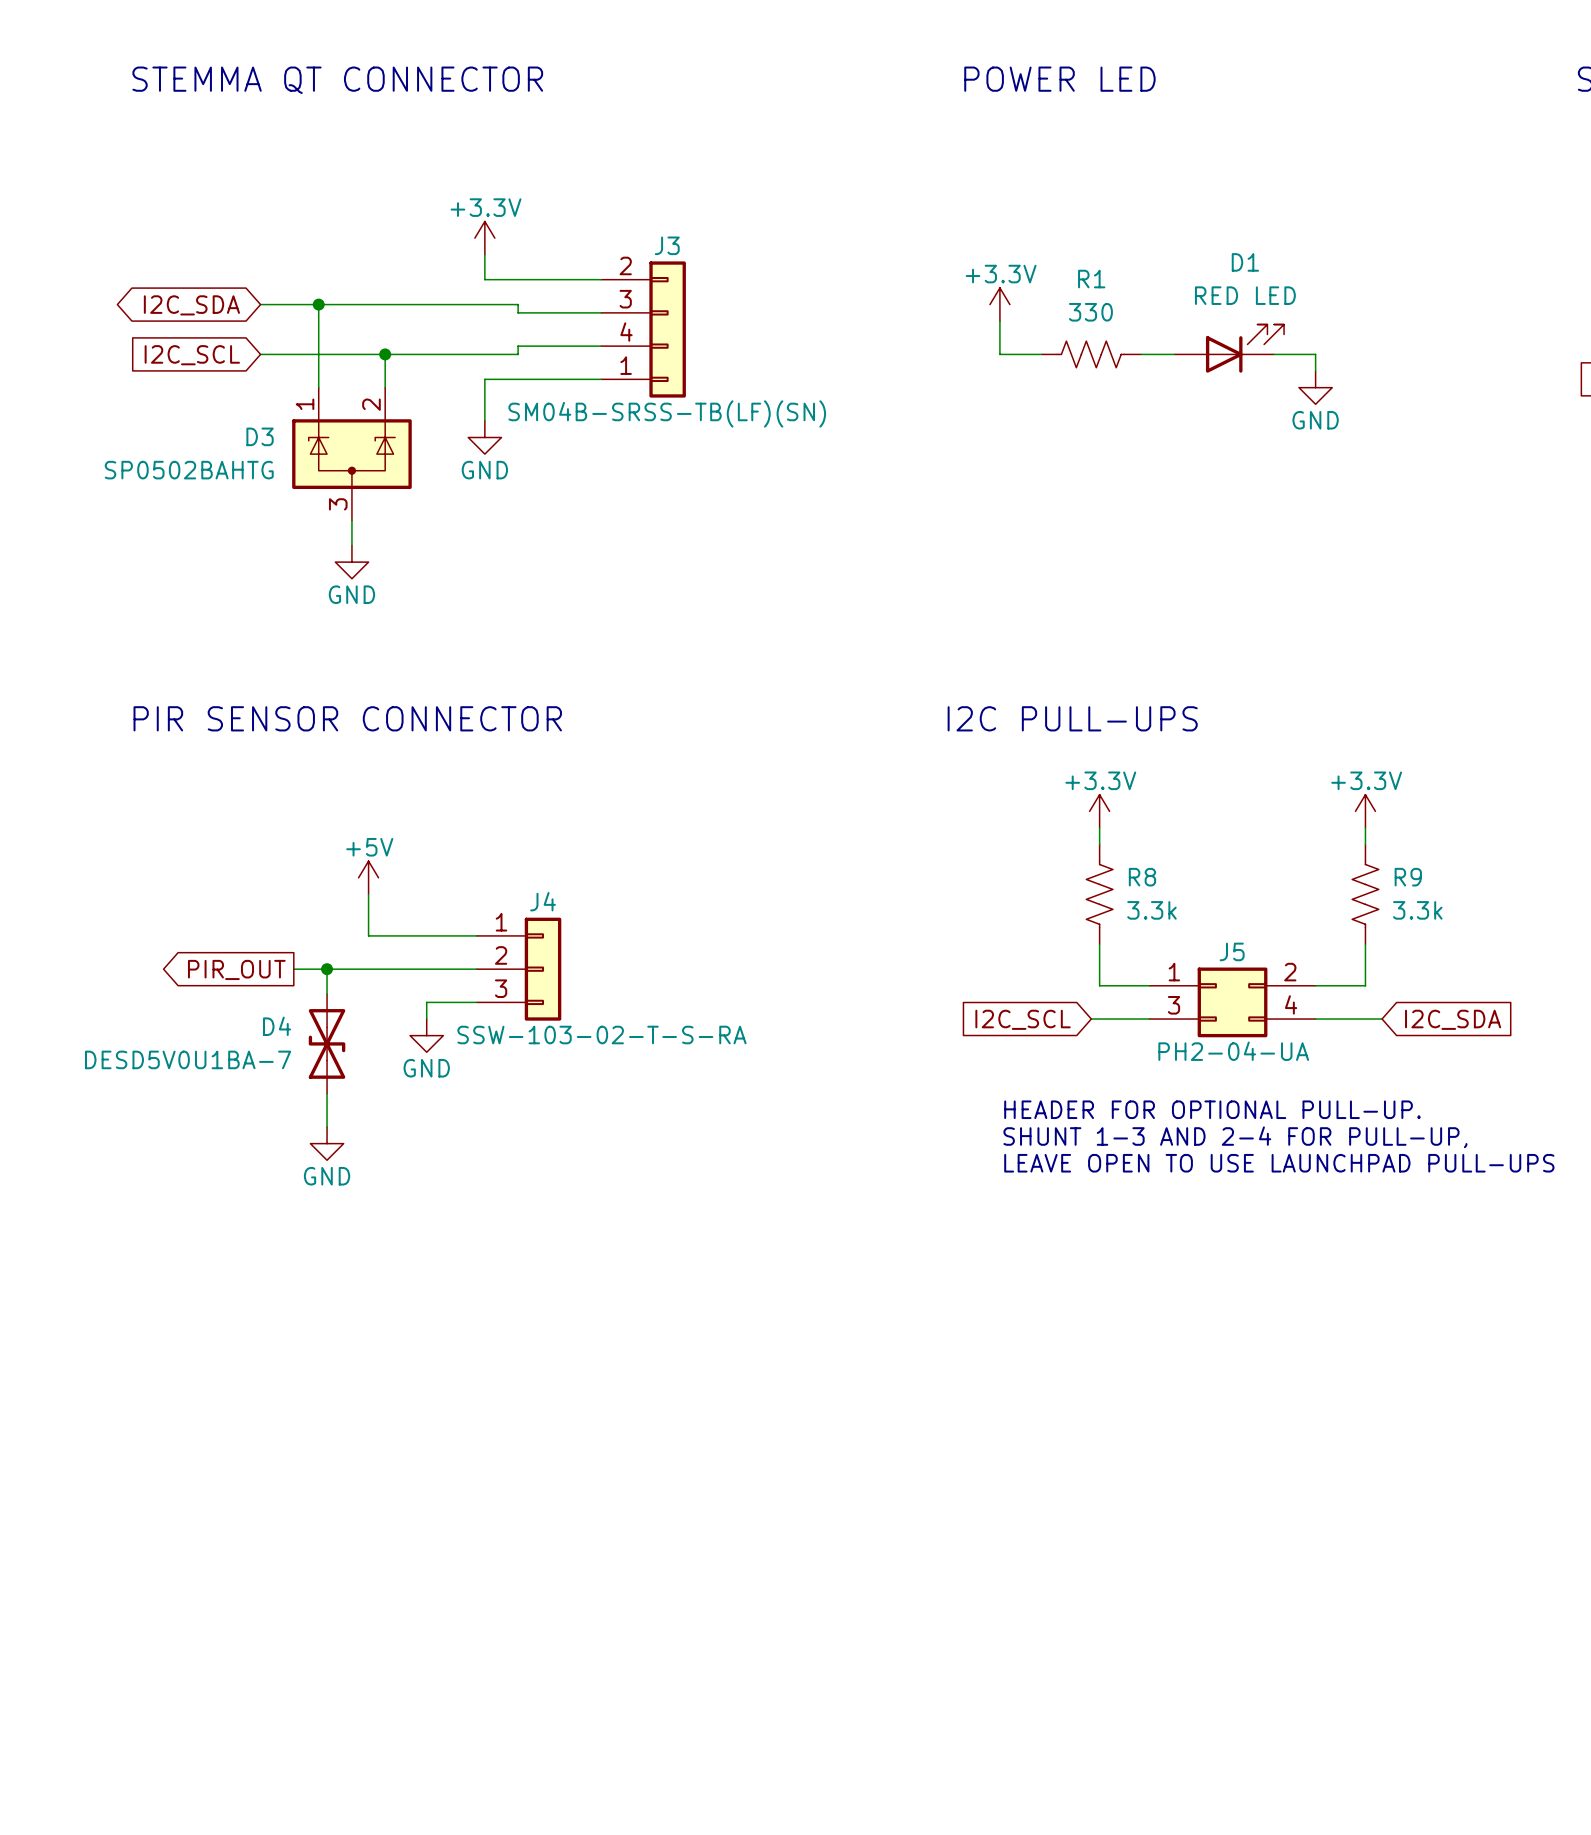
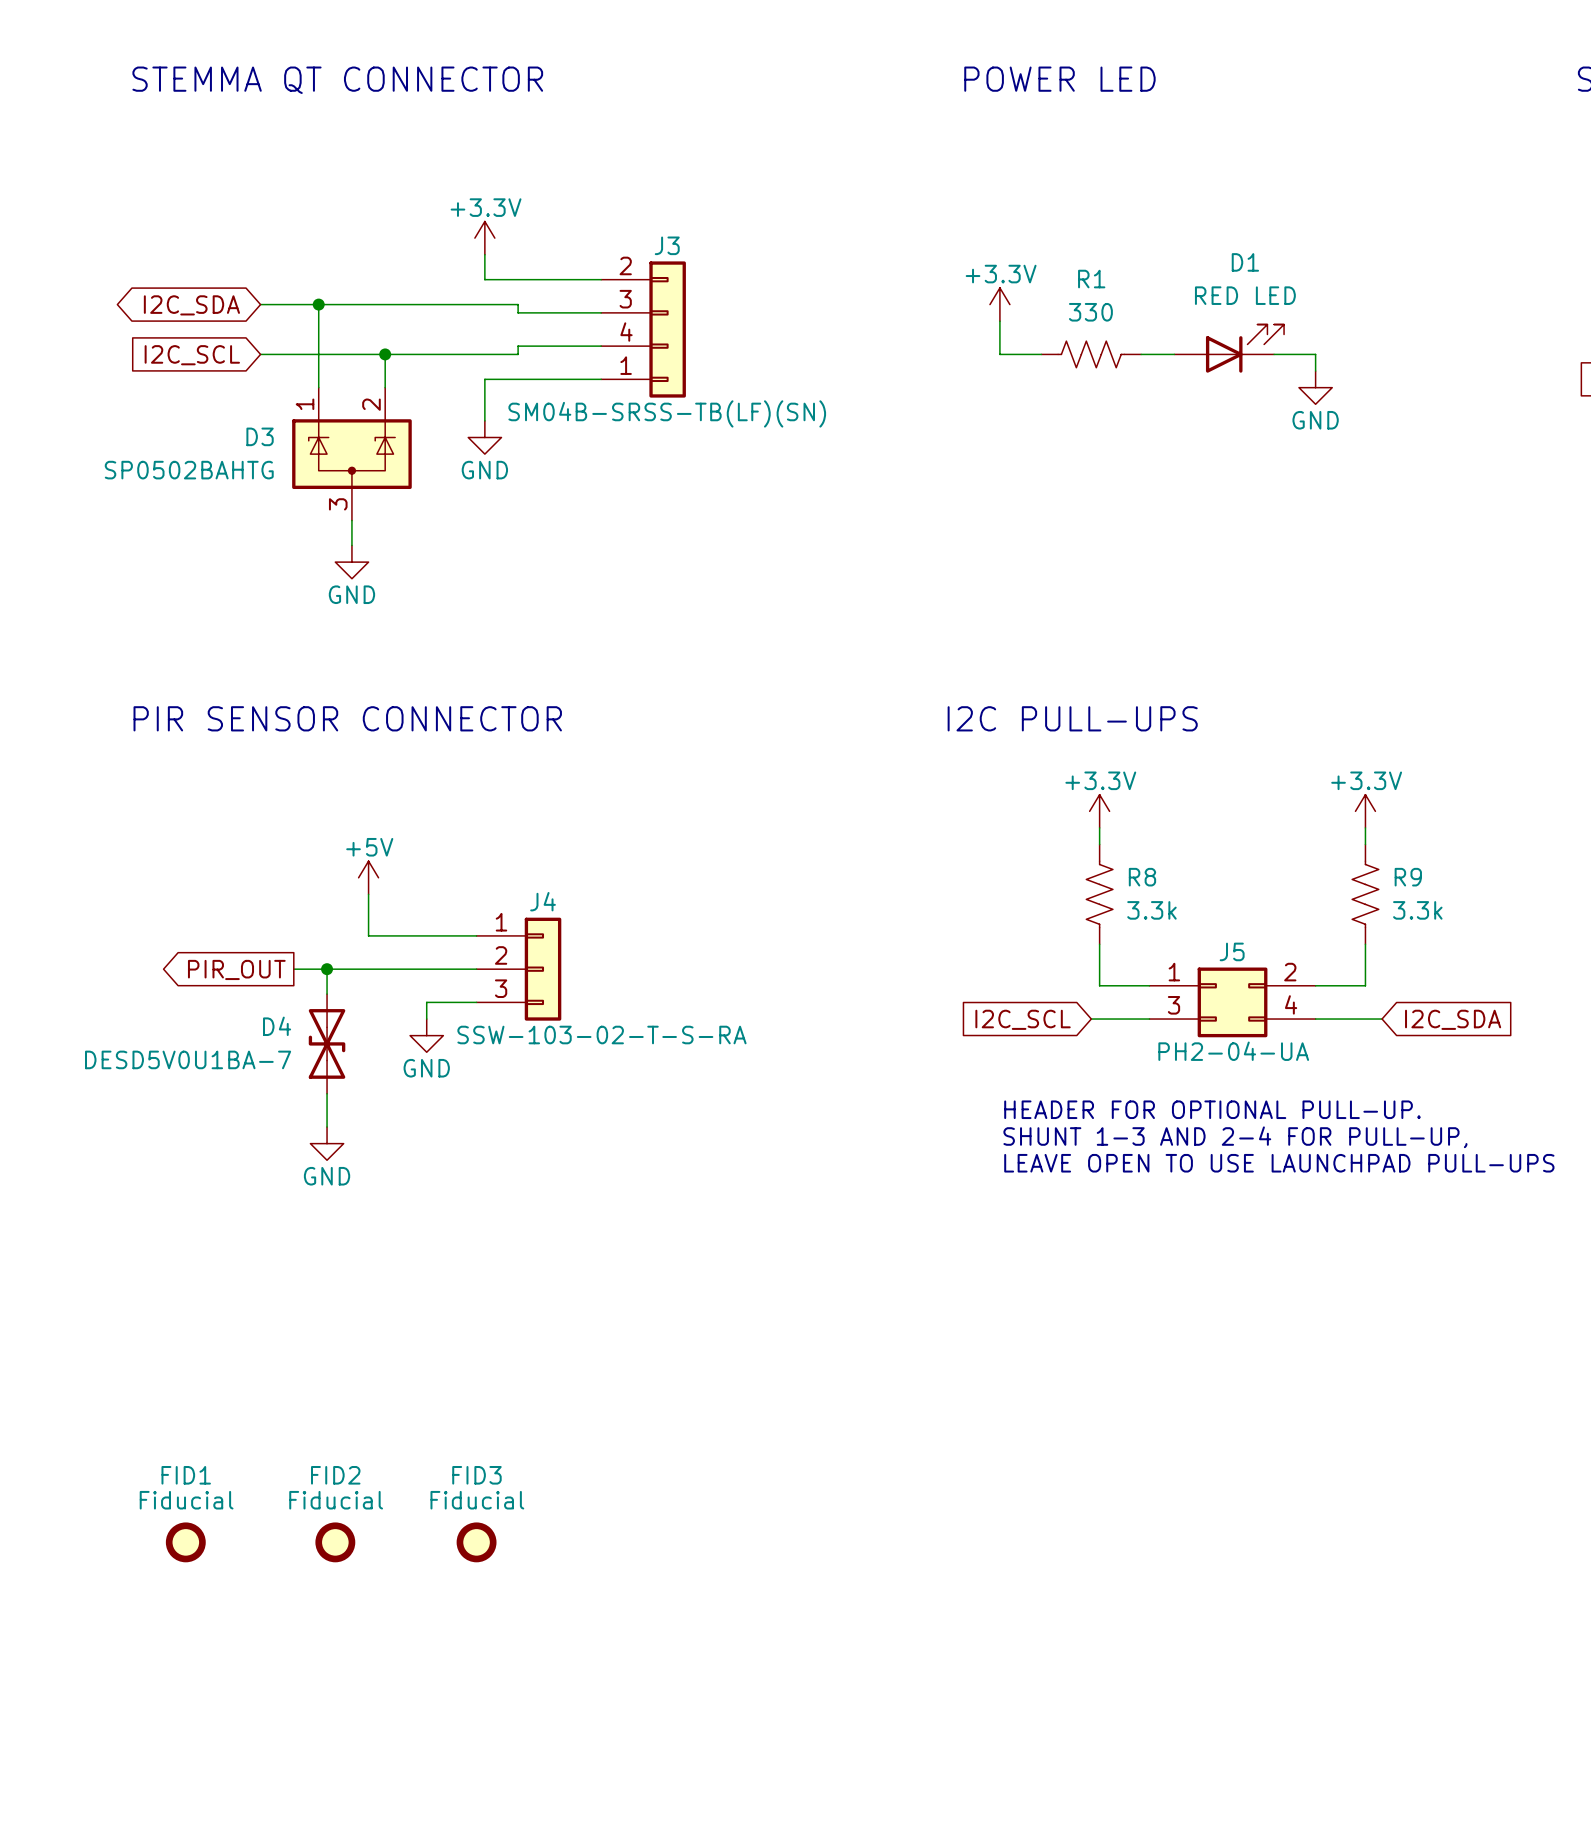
FID1: none -> Fiducial (185, 1542)
FID2: none -> Fiducial (335, 1542)
FID3: none -> Fiducial (476, 1542)

